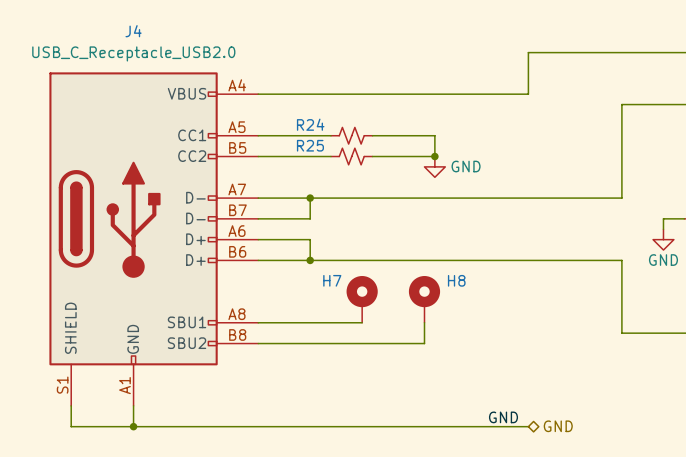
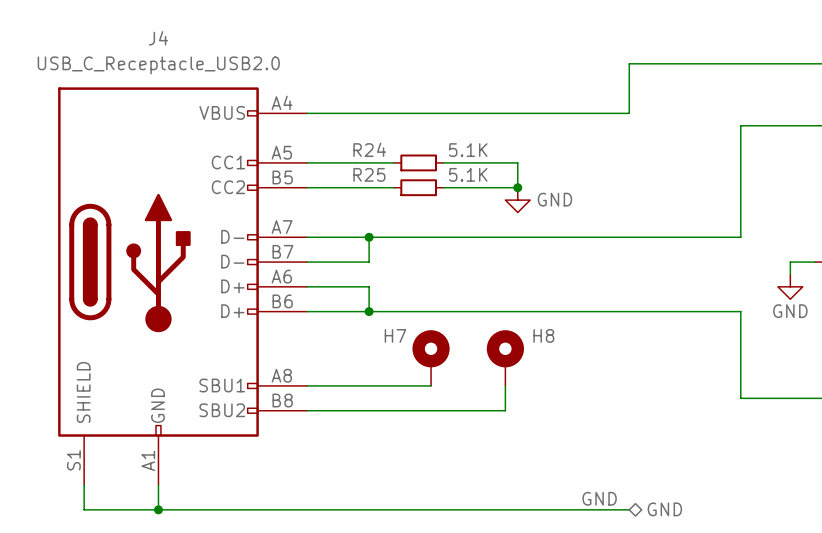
R24 value: none -> 5.1K (468, 150)
R24 symbol: [330, 127, 373, 145] -> [393, 154, 444, 172]
R25 value: none -> 5.1K (468, 174)
R25 symbol: [330, 148, 373, 165] -> [393, 179, 444, 197]

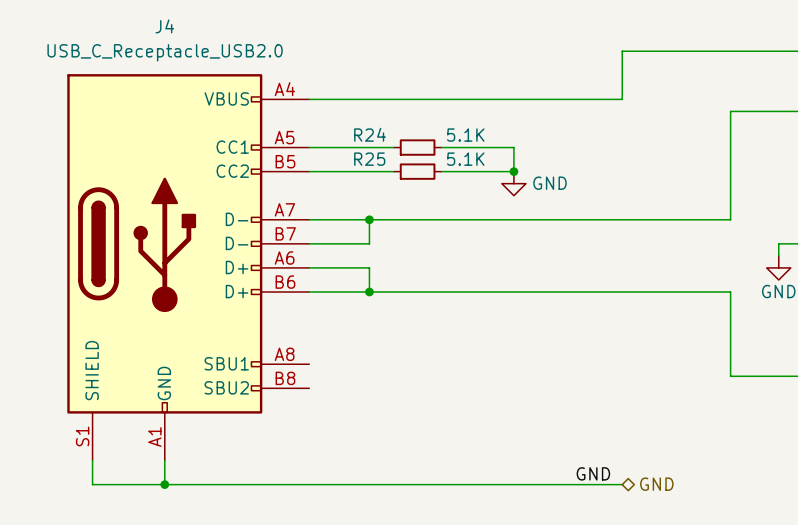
H7: (431, 358) -> none
H8: (505, 358) -> none
wire: (307, 385) (431, 385) -> none
wire: (505, 385) (505, 410) (307, 410) -> none

